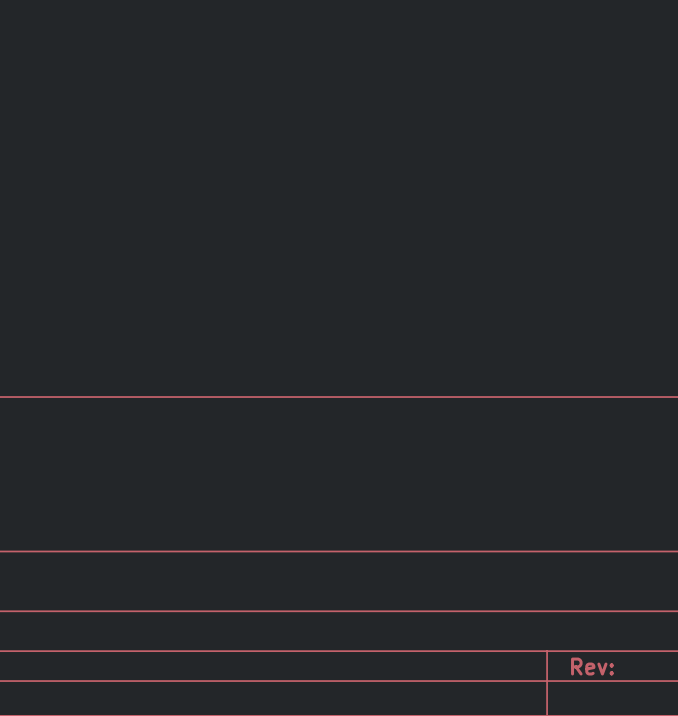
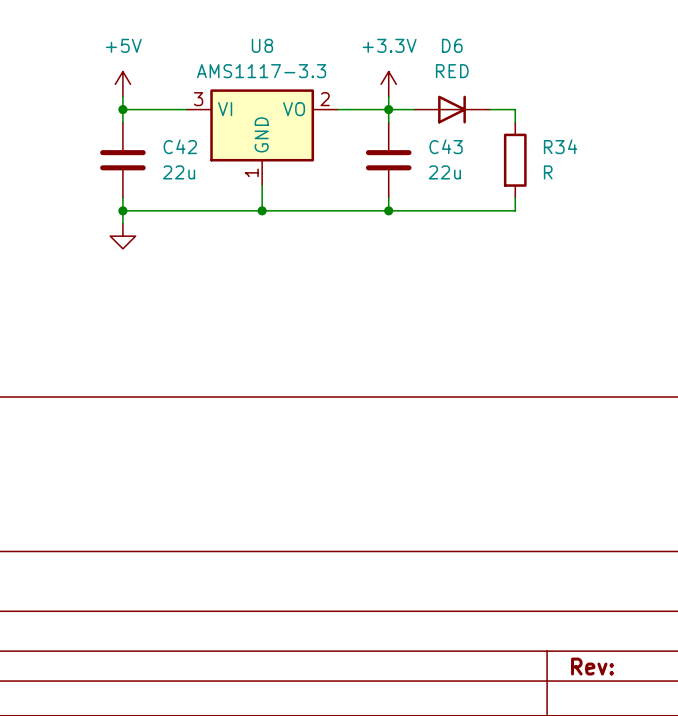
power symbol: none -> +5V (122, 84)
power symbol: none -> +3.3V (388, 84)
wire: none -> (122, 96) (122, 122)
wire: none -> (388, 96) (388, 122)
wire: none -> (122, 109) (186, 109)
junction: none -> (122, 109)
wire: none -> (338, 109) (414, 109)
junction: none -> (388, 109)
D6: none -> RED (452, 109)
wire: none -> (489, 109) (515, 109) (515, 122)
U8: none -> AMS1117-3.3 (262, 137)
C42: none -> 22u (122, 160)
C43: none -> 22u (388, 160)
R34: none -> R (515, 160)
wire: none -> (262, 185) (262, 210)
wire: none -> (122, 198) (122, 223)
wire: none -> (388, 198) (388, 210)
wire: none -> (515, 198) (515, 210) (122, 210)
junction: none -> (122, 210)
junction: none -> (262, 210)
junction: none -> (388, 210)
power symbol: none -> (122, 236)

